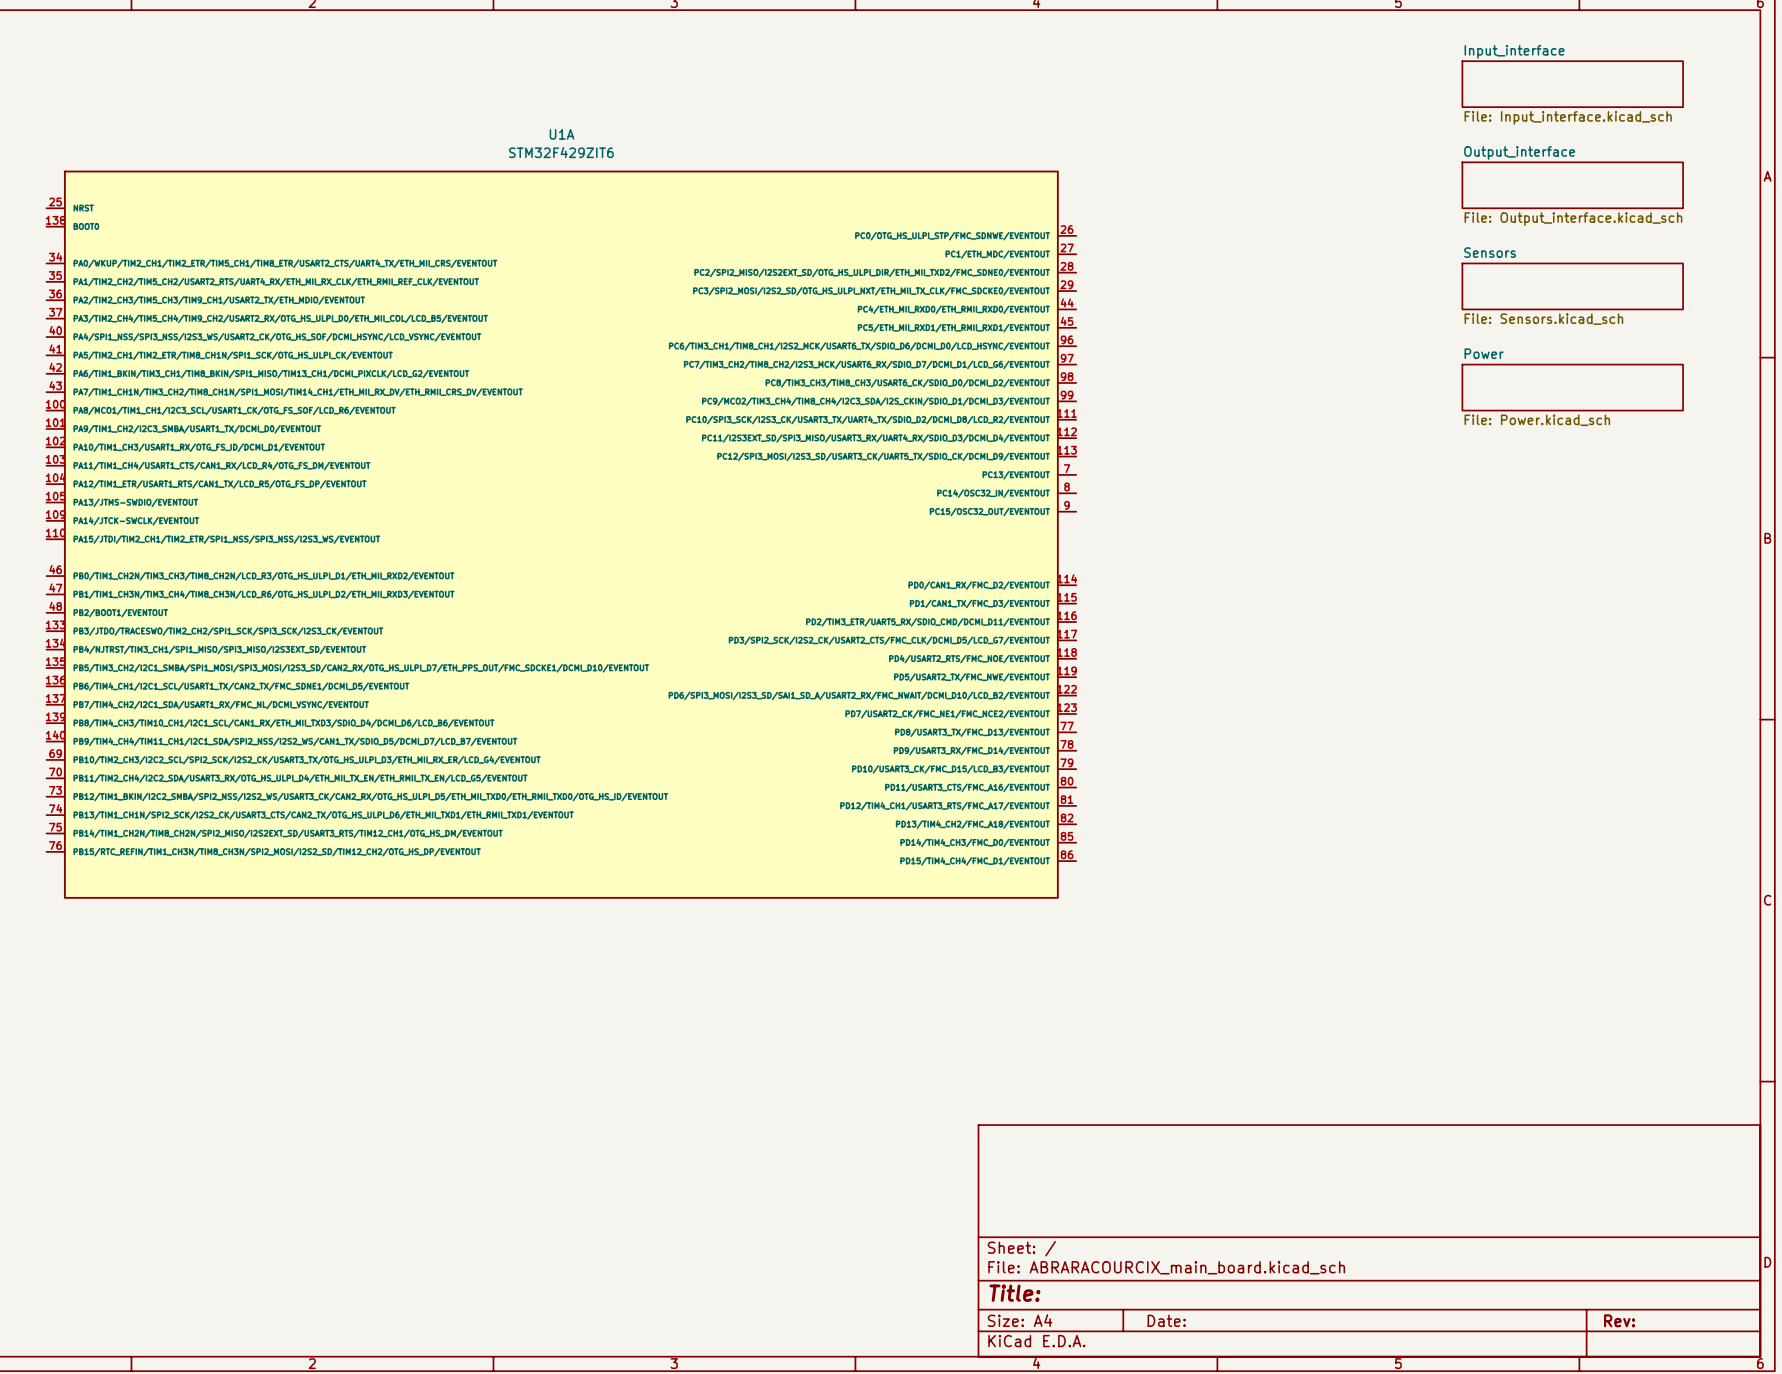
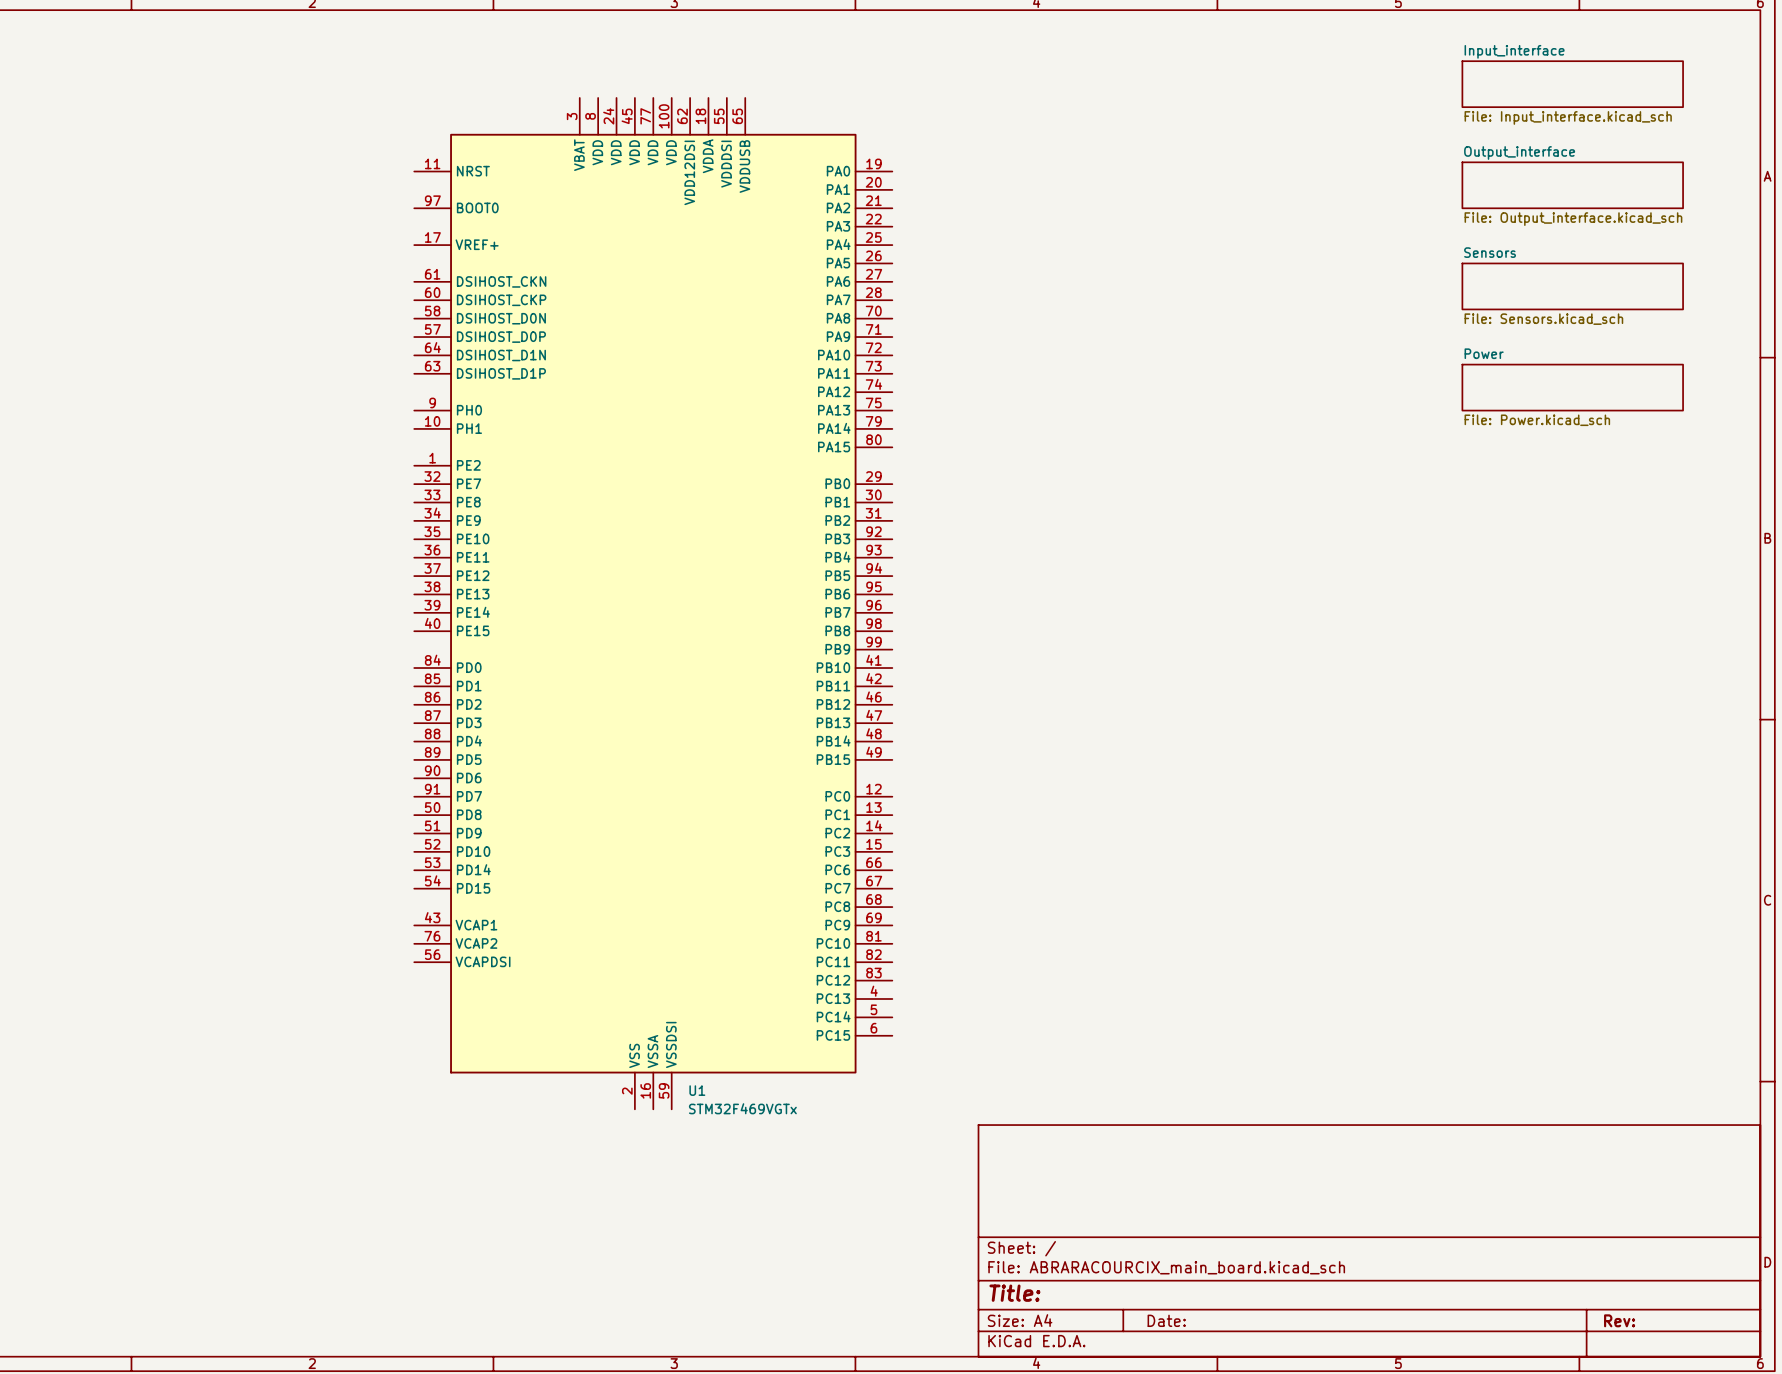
U1A: STM32F429ZIT6 (561, 534) -> none
U1: none -> STM32F469VGTx (653, 603)

